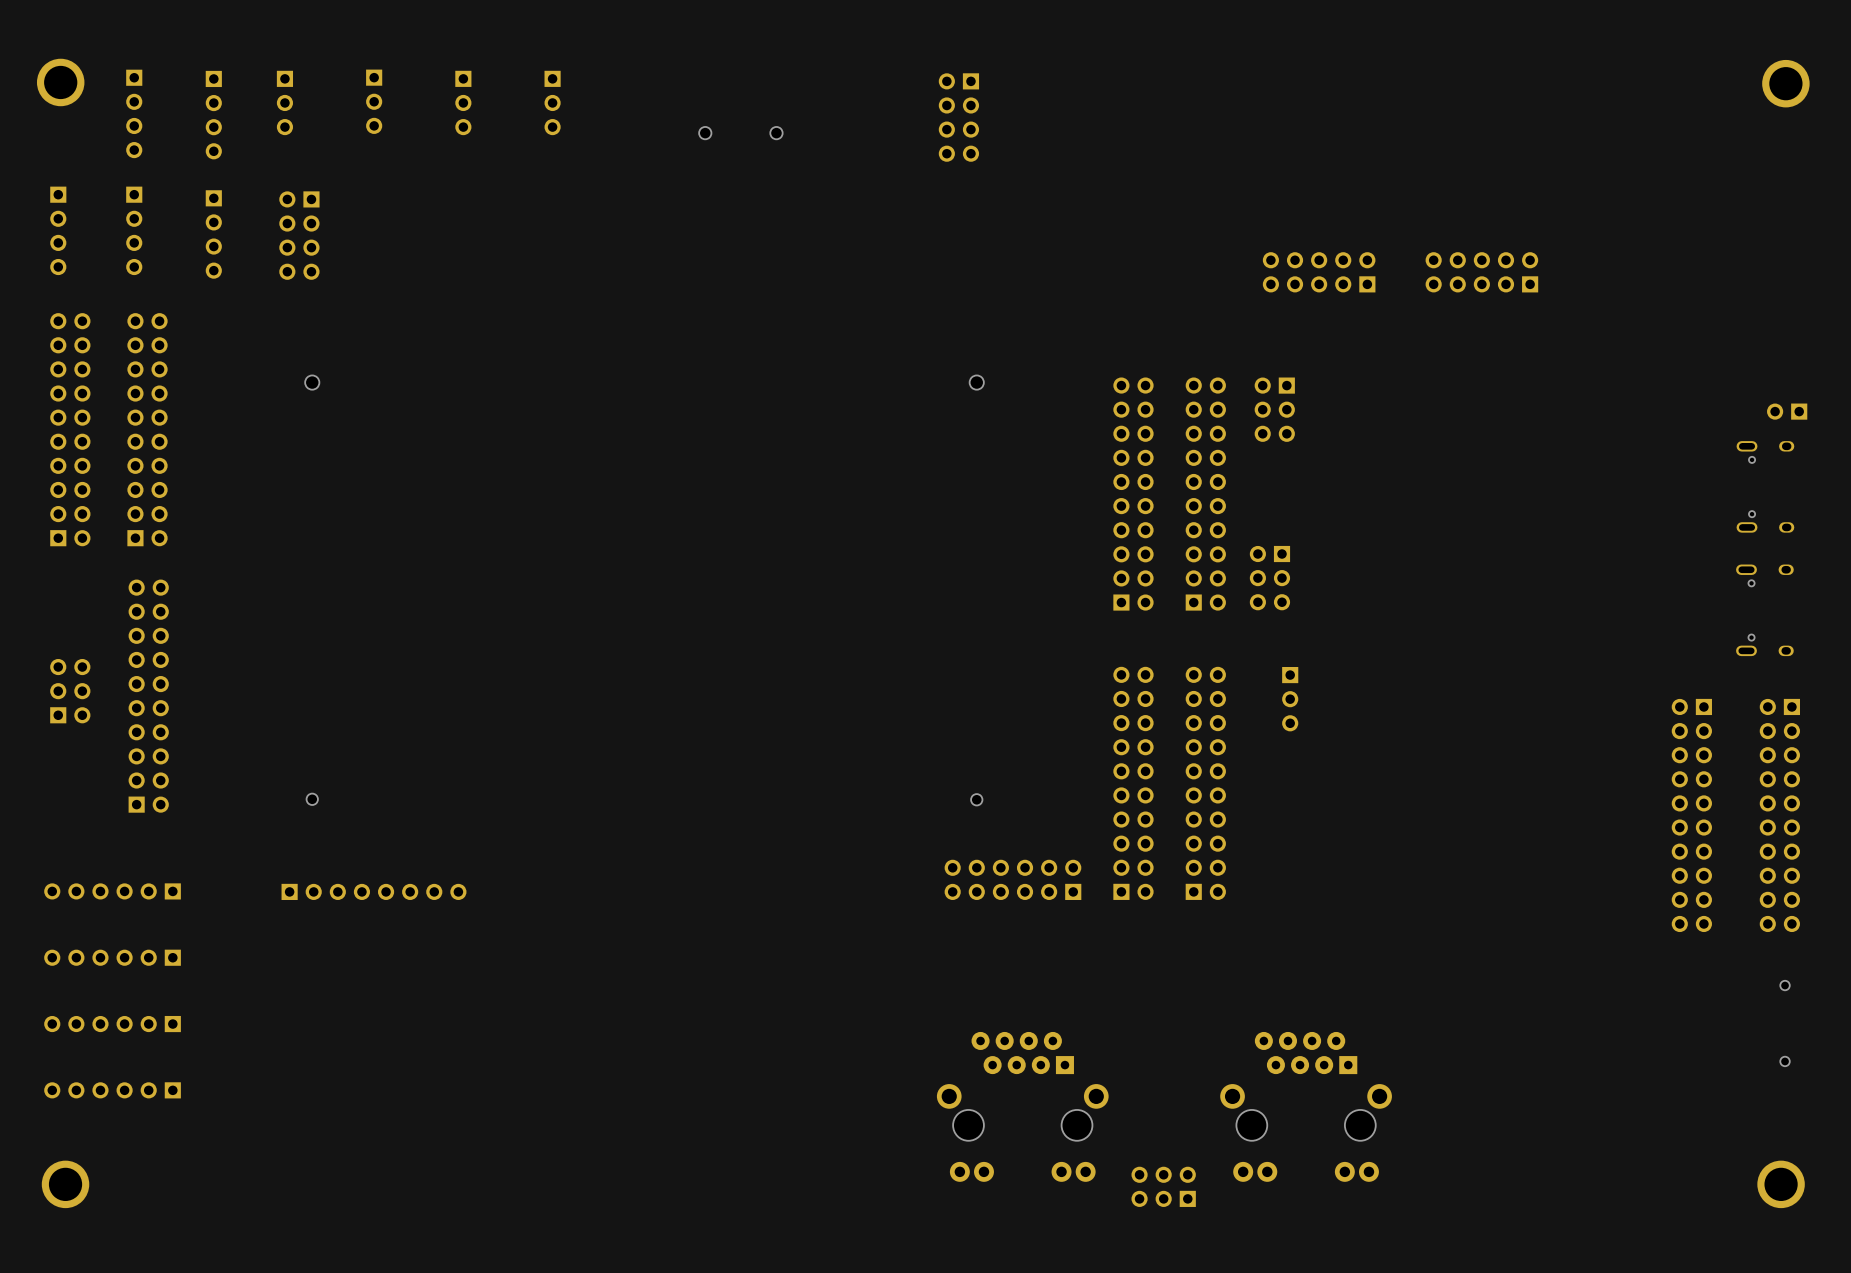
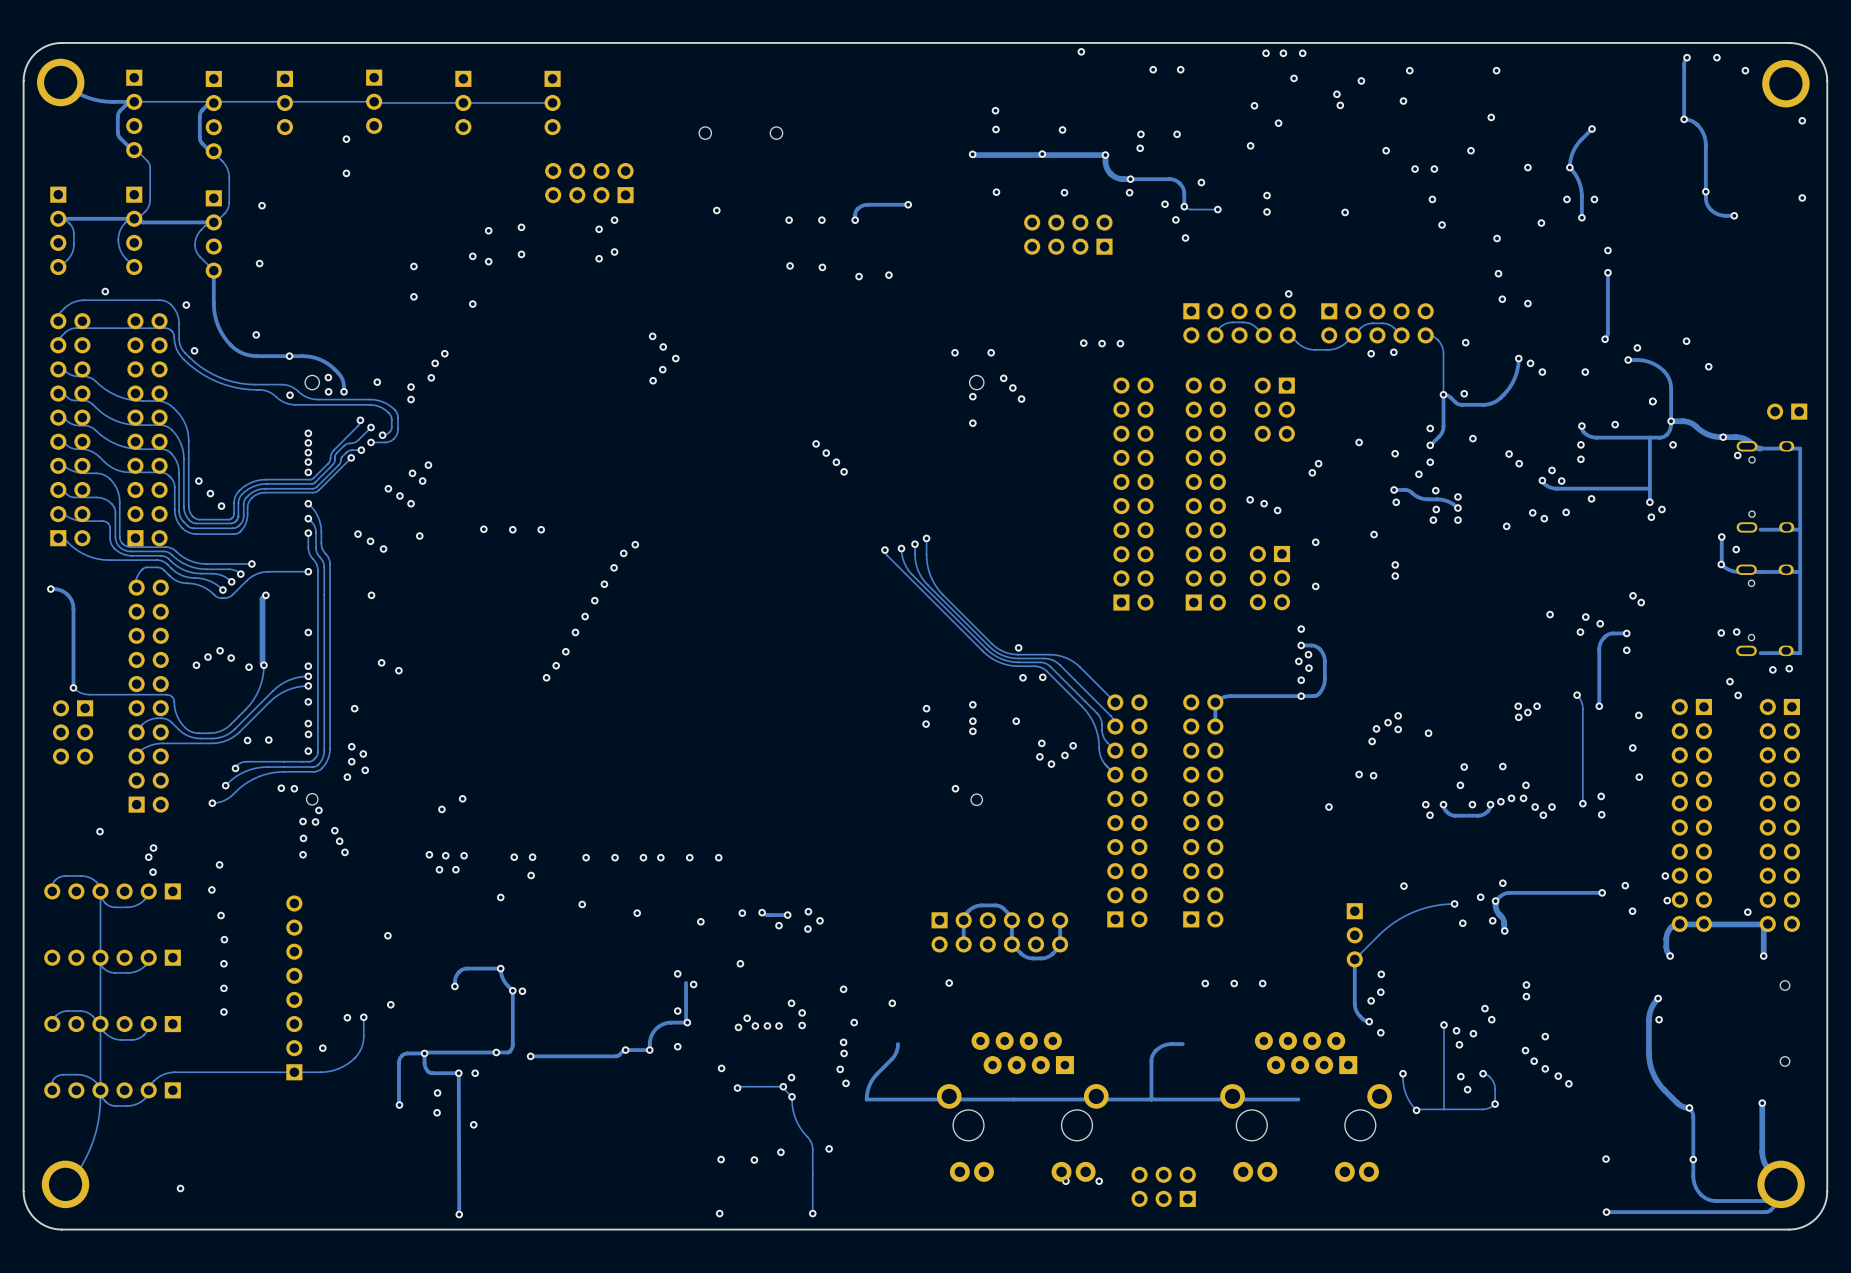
board edge: none -> (1789, 42) (61, 42) (41, 48) (27, 64) (23, 80) (23, 1191) (29, 1211) (41, 1223) (61, 1229) (1789, 1229) (1809, 1223) (1821, 1211) (1827, 1191) (1827, 80) (1825, 68) (1816, 54) (1801, 45) (1789, 42)
via: none -> (1081, 51)
via: none -> (1266, 53)
via: none -> (1283, 53)
via: none -> (1302, 53)
track: none -> (1687, 57) (1684, 64) (1684, 119) (1695, 123) (1704, 136) (1706, 202) (1710, 209) (1717, 214) (1734, 215)
via: none -> (1687, 57)
via: none -> (1716, 57)
via: none -> (1153, 69)
via: none -> (1180, 69)
via: none -> (1409, 70)
via: none -> (1496, 70)
via: none -> (1745, 70)
via: none -> (1294, 78)
track: none -> (61, 80) (74, 91) (90, 98) (106, 101) (134, 101)
via: none -> (1361, 80)
via: none -> (1336, 94)
track: none -> (134, 101) (552, 102)
track: none -> (134, 101) (126, 104) (119, 111) (117, 116) (118, 135) (134, 150)
via: none -> (1403, 101)
track: none -> (213, 103) (207, 105) (200, 112) (200, 139) (224, 163) (229, 177) (228, 207) (224, 213) (213, 222)
via: none -> (1254, 105)
via: none -> (1340, 105)
via: none -> (995, 110)
part rotation: 0° (958, 117) -> 90° clockwise (1068, 234)
part position: (958, 117) -> (1068, 234)
via: none -> (1491, 117)
via: none -> (1684, 119)
via: none -> (1802, 120)
via: none -> (1278, 123)
via: none -> (996, 129)
via: none -> (1062, 129)
track: none -> (1592, 129) (1576, 145) (1570, 163) (1569, 167) (1577, 177) (1581, 188) (1581, 217)
via: none -> (1592, 129)
via: none -> (1140, 134)
via: none -> (1177, 134)
via: none -> (346, 139)
via: none -> (1250, 145)
via: none -> (1140, 148)
track: none -> (134, 150) (147, 161) (150, 167) (149, 204) (140, 216) (134, 218)
via: none -> (1386, 150)
via: none -> (1471, 150)
track: none -> (972, 154) (1105, 155) (1106, 167) (1115, 177) (1123, 179) (1173, 179) (1183, 188) (1185, 207) (1191, 209) (1217, 209)
via: none -> (972, 154)
via: none -> (1042, 154)
via: none -> (1105, 155)
via: none -> (1527, 167)
via: none -> (1569, 167)
via: none -> (1415, 169)
via: none -> (1434, 169)
via: none -> (346, 173)
via: none -> (1130, 179)
via: none -> (1201, 182)
part: none -> (589, 183)
via: none -> (1705, 191)
via: none -> (996, 192)
via: none -> (1064, 192)
via: none -> (1129, 192)
via: none -> (1267, 195)
via: none -> (1802, 197)
via: none -> (1432, 199)
via: none -> (1566, 199)
via: none -> (1594, 199)
track: none -> (908, 204) (863, 205) (856, 210) (855, 220)
via: none -> (908, 204)
via: none -> (1165, 204)
via: none -> (262, 205)
via: none -> (1184, 206)
via: none -> (1217, 209)
via: none -> (716, 210)
via: none -> (1267, 211)
via: none -> (1345, 212)
via: none -> (1734, 215)
via: none -> (1581, 217)
track: none -> (58, 218) (65, 220) (72, 227) (73, 247) (71, 255) (61, 265) (57, 266) (52, 264)
track: none -> (134, 218) (58, 218)
track: none -> (134, 218) (142, 222) (213, 222)
track: none -> (134, 218) (123, 224) (118, 239) (121, 252) (134, 267)
via: none -> (1175, 219)
via: none -> (614, 220)
via: none -> (789, 220)
via: none -> (821, 220)
via: none -> (855, 220)
track: none -> (213, 222) (206, 224) (199, 231) (195, 238) (195, 246) (198, 255) (213, 270) (214, 315) (218, 326) (227, 341) (236, 350) (249, 355) (307, 356) (319, 359) (331, 366) (339, 374) (343, 381) (344, 391)
via: none -> (1541, 223)
via: none -> (1442, 224)
via: none -> (521, 227)
via: none -> (599, 229)
via: none -> (488, 230)
part: (299, 235) -> none
via: none -> (1185, 238)
via: none -> (1497, 238)
via: none -> (1607, 250)
via: none -> (614, 251)
via: none -> (521, 254)
via: none -> (472, 256)
via: none -> (599, 258)
via: none -> (488, 261)
via: none -> (259, 263)
via: none -> (790, 265)
via: none -> (413, 266)
via: none -> (822, 267)
part: (1319, 272) -> none
part: (1481, 272) -> none
track: none -> (1607, 272) (1607, 332) (1605, 339)
via: none -> (1607, 272)
via: none -> (1498, 273)
via: none -> (888, 275)
via: none -> (859, 276)
via: none -> (105, 291)
via: none -> (1288, 293)
via: none -> (413, 296)
via: none -> (1502, 299)
via: none -> (1527, 303)
via: none -> (472, 304)
via: none -> (186, 305)
track: none -> (59, 316) (67, 306) (80, 300) (166, 301) (173, 307) (178, 316) (179, 340) (182, 349) (194, 362) (212, 374) (240, 383) (287, 385) (312, 399) (374, 399) (391, 406) (397, 415) (396, 435) (388, 441) (371, 442)
part: none -> (1239, 323)
part: none -> (1377, 323)
via: none -> (256, 334)
track: none -> (1263, 335) (1252, 324) (1243, 322) (1225, 323) (1217, 330) (1215, 335)
track: none -> (1287, 335) (1303, 346) (1314, 349) (1330, 349) (1340, 346) (1361, 326) (1370, 323) (1388, 324) (1401, 335)
track: none -> (1425, 335) (1435, 337) (1442, 347) (1443, 394)
via: none -> (652, 336)
via: none -> (1605, 339)
track: none -> (59, 340) (66, 331) (74, 328) (167, 328) (173, 333) (175, 346) (181, 356) (196, 370) (210, 378) (233, 387) (266, 390) (281, 401) (291, 404) (376, 405) (385, 410) (391, 417) (390, 430) (382, 435)
via: none -> (1686, 341)
via: none -> (1465, 342)
via: none -> (1083, 343)
via: none -> (1102, 343)
via: none -> (1120, 343)
via: none -> (663, 346)
via: none -> (1637, 347)
via: none -> (194, 350)
via: none -> (955, 352)
via: none -> (991, 352)
via: none -> (1393, 352)
via: none -> (444, 353)
via: none -> (1371, 353)
via: none -> (289, 356)
via: none -> (675, 358)
track: none -> (1518, 358) (1512, 382) (1503, 394) (1492, 402) (1460, 404) (1443, 394)
via: none -> (1518, 358)
track: none -> (1628, 360) (1651, 362) (1661, 368) (1668, 376) (1671, 388) (1671, 425) (1668, 432) (1661, 437) (1594, 437) (1585, 433) (1581, 426)
via: none -> (1628, 360)
via: none -> (435, 363)
via: none -> (1530, 363)
track: none -> (59, 364) (71, 374) (91, 378) (117, 395) (136, 400) (163, 402) (179, 413) (185, 424) (188, 436) (189, 509) (193, 516) (198, 519) (231, 518) (233, 515) (236, 494) (245, 485) (255, 481) (312, 478) (328, 462) (332, 451) (358, 426) (360, 420)
via: none -> (1708, 366)
via: none -> (662, 369)
via: none -> (1542, 372)
via: none -> (1585, 372)
via: none -> (328, 377)
via: none -> (431, 377)
via: none -> (1003, 378)
via: none -> (653, 380)
via: none -> (377, 382)
via: none -> (411, 387)
via: none -> (1012, 387)
track: none -> (59, 388) (69, 399) (88, 401) (105, 415) (120, 422) (132, 424) (161, 425) (169, 427) (179, 439) (183, 451) (184, 509) (188, 518) (195, 523) (230, 523) (235, 521) (238, 516)
via: none -> (328, 391)
via: none -> (344, 391)
via: none -> (1464, 393)
track: none -> (1443, 394) (1442, 430) (1430, 445)
via: none -> (1443, 394)
via: none -> (290, 395)
via: none -> (972, 396)
via: none -> (411, 399)
via: none -> (1021, 399)
via: none -> (1652, 401)
track: none -> (59, 413) (69, 423) (90, 426) (105, 438) (122, 446) (134, 448) (163, 449) (169, 451) (178, 467) (179, 515) (187, 525) (192, 528) (236, 527) (243, 519) (244, 500) (251, 492) (262, 488) (314, 488) (339, 464) (341, 457) (347, 451) (361, 450)
via: none -> (360, 420)
track: none -> (1671, 421) (1690, 422) (1704, 433) (1714, 436) (1742, 438) (1758, 448) (1800, 448) (1800, 653) (1760, 653)
via: none -> (1671, 421)
via: none -> (972, 423)
via: none -> (1615, 424)
via: none -> (1581, 426)
track: none -> (371, 427) (357, 440) (344, 445) (335, 454) (333, 463) (314, 483) (263, 484) (247, 489) (238, 499) (238, 517)
via: none -> (371, 427)
via: none -> (1430, 428)
via: none -> (308, 433)
via: none -> (382, 435)
track: none -> (59, 437) (71, 447) (94, 452) (116, 469) (129, 472) (161, 472) (168, 475) (174, 485) (176, 519) (183, 529) (194, 533) (238, 533) (246, 521) (248, 502) (255, 495) (265, 492) (316, 491) (351, 457)
track: none -> (1649, 437) (1649, 502)
via: none -> (1723, 437)
via: none -> (1472, 438)
via: none -> (308, 442)
via: none -> (371, 442)
via: none -> (1359, 442)
via: none -> (816, 443)
via: none -> (1580, 444)
via: none -> (1673, 444)
via: none -> (1430, 445)
via: none -> (361, 450)
via: none -> (308, 452)
via: none -> (826, 453)
via: none -> (1395, 453)
via: none -> (1509, 454)
via: none -> (1737, 455)
via: none -> (351, 457)
via: none -> (1580, 459)
track: none -> (59, 461) (72, 470) (101, 474) (112, 481) (119, 495) (119, 537) (125, 545) (168, 547) (186, 558) (202, 563) (251, 563)
via: none -> (308, 462)
via: none -> (836, 462)
via: none -> (1430, 462)
via: none -> (1318, 463)
via: none -> (1519, 463)
via: none -> (428, 465)
via: none -> (1552, 470)
via: none -> (844, 471)
via: none -> (308, 472)
via: none -> (1312, 472)
via: none -> (412, 473)
via: none -> (1418, 474)
track: none -> (1542, 480) (1546, 485) (1555, 488) (1649, 488)
via: none -> (1542, 480)
via: none -> (198, 481)
via: none -> (422, 481)
via: none -> (1561, 481)
track: none -> (59, 485) (70, 496) (99, 497) (111, 503) (115, 511) (115, 540) (123, 549) (129, 551) (166, 551) (192, 567) (230, 569) (240, 574)
via: none -> (388, 488)
track: none -> (1394, 489) (1407, 490) (1422, 498) (1445, 500) (1457, 508)
via: none -> (1394, 489)
via: none -> (1435, 490)
via: none -> (210, 493)
via: none -> (399, 495)
via: none -> (1457, 496)
via: none -> (1591, 498)
via: none -> (1250, 499)
via: none -> (1396, 502)
via: none -> (1649, 502)
track: none -> (308, 503) (318, 517) (321, 547) (329, 562) (328, 756) (323, 766) (318, 770) (278, 772) (262, 775) (248, 781) (226, 799) (212, 803)
via: none -> (308, 503)
via: none -> (411, 503)
via: none -> (1264, 503)
via: none -> (221, 506)
via: none -> (1457, 508)
track: none -> (59, 509) (74, 519) (106, 522) (109, 526) (111, 545) (122, 553) (163, 556) (184, 570) (197, 573) (217, 574) (231, 581)
via: none -> (1436, 509)
via: none -> (1661, 509)
via: none -> (1277, 510)
via: none -> (1532, 512)
via: none -> (1566, 512)
via: none -> (1651, 517)
track: none -> (308, 518) (315, 528) (316, 551) (324, 566) (323, 756) (319, 763) (314, 766) (267, 767) (251, 769) (236, 776) (225, 785)
via: none -> (308, 518)
via: none -> (1544, 518)
via: none -> (1433, 520)
via: none -> (1457, 520)
via: none -> (1506, 526)
via: none -> (483, 529)
via: none -> (512, 529)
via: none -> (541, 529)
track: none -> (1800, 529) (1760, 529)
track: none -> (59, 533) (77, 550) (92, 557) (109, 560) (159, 560) (182, 575) (206, 579) (222, 590)
track: none -> (308, 533) (308, 551) (316, 563) (317, 570) (317, 754) (309, 761) (244, 761) (238, 764) (235, 768)
via: none -> (308, 533)
via: none -> (358, 534)
via: none -> (1374, 534)
via: none -> (419, 536)
track: none -> (1721, 536) (1721, 564) (1729, 570) (1739, 571) (1800, 571)
via: none -> (1721, 536)
track: none -> (926, 538) (927, 565) (936, 586) (994, 646) (1010, 653) (1053, 654) (1066, 657) (1077, 664) (1115, 702)
via: none -> (926, 538)
via: none -> (370, 541)
via: none -> (1315, 542)
via: none -> (635, 544)
track: none -> (914, 544) (915, 562) (922, 578) (989, 646) (998, 653) (1010, 657) (1047, 658) (1055, 661) (1110, 716) (1115, 726)
via: none -> (914, 544)
track: none -> (901, 548) (904, 562) (909, 572) (989, 651) (1009, 661) (1041, 662) (1050, 666) (1098, 715) (1101, 720) (1103, 736) (1115, 750)
via: none -> (901, 548)
via: none -> (383, 549)
via: none -> (1736, 549)
track: none -> (884, 550) (887, 555) (986, 654) (1004, 664) (1037, 666) (1047, 671) (1089, 715) (1096, 730) (1101, 757) (1106, 766)
via: none -> (884, 550)
via: none -> (623, 553)
via: none -> (251, 563)
via: none -> (1395, 564)
via: none -> (1721, 564)
via: none -> (614, 567)
track: none -> (308, 571) (259, 573) (251, 576) (231, 595) (225, 598) (216, 596) (201, 586) (177, 581) (158, 567) (142, 568) (136, 577) (135, 586)
via: none -> (308, 571)
via: none -> (240, 574)
via: none -> (1395, 576)
via: none -> (231, 581)
via: none -> (604, 584)
via: none -> (1315, 586)
track: none -> (50, 589) (65, 593) (73, 604) (73, 687) (86, 694) (169, 695) (173, 699) (175, 711) (181, 723) (189, 730) (198, 733) (215, 732) (226, 728) (245, 709) (256, 694) (263, 671) (262, 598) (265, 595)
via: none -> (50, 589)
via: none -> (222, 590)
via: none -> (265, 595)
via: none -> (371, 595)
via: none -> (1633, 595)
via: none -> (594, 600)
via: none -> (1641, 602)
via: none -> (1550, 614)
via: none -> (585, 616)
via: none -> (1585, 617)
via: none -> (1600, 623)
via: none -> (1301, 629)
via: none -> (1736, 631)
via: none -> (308, 632)
via: none -> (575, 632)
via: none -> (1580, 632)
via: none -> (1721, 632)
track: none -> (1626, 633) (1608, 634) (1600, 643) (1599, 706)
via: none -> (1626, 633)
track: none -> (1301, 645) (1315, 646) (1324, 656) (1324, 681) (1318, 694) (1313, 696) (1224, 696) (1215, 702) (1215, 726)
via: none -> (1301, 645)
via: none -> (1018, 647)
via: none -> (220, 650)
via: none -> (1626, 650)
via: none -> (565, 651)
via: none -> (1308, 654)
via: none -> (208, 657)
via: none -> (231, 658)
via: none -> (1298, 661)
via: none -> (381, 662)
via: none -> (196, 665)
via: none -> (263, 665)
via: none -> (556, 665)
via: none -> (308, 666)
via: none -> (249, 667)
via: none -> (1308, 668)
via: none -> (1789, 668)
via: none -> (1772, 669)
via: none -> (398, 670)
track: none -> (308, 676) (293, 678) (280, 684) (232, 731) (221, 737) (191, 737) (163, 718) (149, 719) (135, 730)
via: none -> (308, 676)
via: none -> (546, 677)
via: none -> (1023, 677)
via: none -> (1042, 677)
via: none -> (1301, 680)
via: none -> (1729, 681)
track: none -> (308, 685) (292, 688) (277, 695) (236, 734) (227, 740) (215, 743) (155, 744) (144, 748) (135, 754)
via: none -> (308, 685)
via: none -> (73, 687)
part rotation: 0° (70, 691) -> 180° (73, 732)
part position: (70, 691) -> (73, 732)
track: none -> (1577, 695) (1581, 701) (1582, 709) (1582, 803)
via: none -> (1577, 695)
via: none -> (1738, 695)
via: none -> (1301, 696)
part: (1290, 699) -> none
via: none -> (308, 701)
via: none -> (972, 704)
via: none -> (1518, 706)
via: none -> (1537, 706)
via: none -> (1599, 706)
via: none -> (354, 708)
via: none -> (926, 708)
via: none -> (1527, 712)
via: none -> (1398, 715)
via: none -> (1638, 715)
via: none -> (1518, 717)
via: none -> (972, 721)
via: none -> (1016, 721)
via: none -> (1388, 722)
via: none -> (308, 723)
via: none -> (926, 724)
via: none -> (1376, 728)
via: none -> (1398, 729)
via: none -> (972, 731)
via: none -> (1428, 733)
via: none -> (308, 734)
via: none -> (247, 740)
via: none -> (268, 740)
via: none -> (1372, 741)
via: none -> (1041, 743)
via: none -> (1073, 745)
via: none -> (351, 746)
via: none -> (1632, 747)
via: none -> (308, 751)
via: none -> (363, 753)
via: none -> (1064, 755)
via: none -> (1039, 756)
via: none -> (351, 761)
via: none -> (1051, 764)
via: none -> (1502, 766)
via: none -> (1464, 767)
via: none -> (235, 768)
via: none -> (365, 770)
via: none -> (1359, 774)
via: none -> (1373, 775)
via: none -> (347, 777)
via: none -> (1639, 777)
part position: (1133, 783) -> (1127, 810)
part position: (1205, 783) -> (1203, 810)
via: none -> (225, 785)
via: none -> (1460, 785)
via: none -> (1525, 785)
via: none -> (281, 788)
via: none -> (294, 788)
via: none -> (955, 788)
via: none -> (1601, 796)
via: none -> (462, 798)
via: none -> (1511, 798)
via: none -> (1523, 798)
via: none -> (1500, 801)
via: none -> (212, 803)
via: none -> (1582, 803)
via: none -> (1425, 804)
track: none -> (1443, 804) (1447, 812) (1455, 815) (1481, 815) (1488, 810) (1490, 804)
via: none -> (1443, 804)
via: none -> (1472, 804)
via: none -> (1490, 804)
via: none -> (1328, 807)
via: none -> (1535, 807)
via: none -> (1552, 807)
via: none -> (441, 809)
via: none -> (318, 810)
via: none -> (1601, 814)
via: none -> (1430, 815)
via: none -> (1543, 815)
via: none -> (303, 821)
via: none -> (315, 821)
via: none -> (334, 830)
via: none -> (100, 831)
via: none -> (303, 838)
via: none -> (339, 841)
via: none -> (153, 848)
via: none -> (344, 852)
via: none -> (303, 854)
via: none -> (429, 854)
via: none -> (445, 855)
via: none -> (464, 855)
via: none -> (148, 857)
via: none -> (514, 857)
via: none -> (532, 857)
via: none -> (586, 857)
via: none -> (615, 857)
via: none -> (643, 857)
via: none -> (660, 857)
via: none -> (689, 857)
via: none -> (718, 857)
via: none -> (219, 864)
via: none -> (439, 869)
via: none -> (455, 869)
via: none -> (153, 872)
via: none -> (531, 875)
via: none -> (1665, 875)
part rotation: 0° (1012, 879) -> 180° (999, 932)
via: none -> (1502, 883)
via: none -> (1625, 885)
via: none -> (1403, 886)
via: none -> (211, 889)
track: none -> (100, 891) (99, 1115) (95, 1132) (86, 1156) (78, 1171) (61, 1191)
track: none -> (100, 891) (98, 885) (94, 880) (81, 875) (58, 877) (53, 883) (52, 891)
track: none -> (148, 891) (146, 897) (140, 903) (126, 907) (108, 905) (102, 899) (100, 891)
part rotation: 0° (374, 891) -> 90° counterclockwise (294, 987)
part position: (374, 891) -> (294, 987)
track: none -> (1602, 892) (1504, 893) (1495, 901) (1495, 905) (1497, 911) (1503, 919) (1504, 930)
via: none -> (1602, 892)
via: none -> (500, 897)
via: none -> (1480, 897)
via: none -> (1667, 900)
via: none -> (1495, 901)
track: none -> (1454, 903) (1426, 907) (1401, 918) (1383, 930) (1354, 959) (1355, 1007) (1360, 1016) (1369, 1021)
via: none -> (1454, 903)
via: none -> (582, 904)
via: none -> (808, 911)
via: none -> (1632, 911)
track: none -> (762, 912) (767, 915) (787, 915)
via: none -> (762, 912)
via: none -> (1747, 912)
via: none -> (637, 913)
via: none -> (742, 913)
via: none -> (221, 915)
via: none -> (787, 915)
via: none -> (819, 920)
track: none -> (1060, 920) (1059, 947) (1047, 957) (1030, 958) (1022, 954) (1011, 944) (1011, 918) (1003, 908) (997, 905) (978, 905) (970, 909) (964, 916) (963, 944)
via: none -> (1492, 920)
via: none -> (700, 921)
via: none -> (1462, 923)
track: none -> (1765, 924) (1675, 924) (1670, 928) (1666, 936) (1666, 948) (1670, 956)
track: none -> (1765, 924) (1763, 956)
via: none -> (778, 925)
via: none -> (807, 929)
via: none -> (1504, 930)
via: none -> (387, 935)
part: none -> (1354, 935)
via: none -> (224, 939)
via: none -> (1670, 956)
via: none -> (1763, 956)
track: none -> (148, 957) (143, 967) (130, 972) (108, 971) (102, 967) (100, 961)
via: none -> (223, 963)
via: none -> (740, 963)
via: none -> (500, 968)
via: none -> (677, 973)
via: none -> (1381, 974)
track: none -> (686, 982) (687, 1022)
via: none -> (949, 983)
via: none -> (1205, 983)
via: none -> (1234, 983)
via: none -> (1262, 983)
via: none -> (693, 984)
via: none -> (1526, 984)
track: none -> (454, 986) (455, 976) (462, 969) (500, 968) (503, 980) (512, 990) (512, 1048) (507, 1052) (424, 1053)
via: none -> (454, 986)
via: none -> (223, 988)
via: none -> (843, 989)
via: none -> (512, 990)
via: none -> (522, 991)
via: none -> (1380, 992)
via: none -> (1526, 996)
track: none -> (1658, 998) (1651, 1008) (1649, 1016) (1649, 1063) (1655, 1077) (1660, 1086) (1678, 1104) (1689, 1107) (1692, 1112) (1693, 1179) (1698, 1192) (1705, 1198) (1713, 1200) (1766, 1201) (1778, 1198) (1789, 1191)
via: none -> (1658, 998)
via: none -> (1371, 1000)
via: none -> (791, 1003)
via: none -> (892, 1003)
via: none -> (390, 1004)
via: none -> (1484, 1008)
via: none -> (223, 1011)
via: none -> (677, 1011)
via: none -> (802, 1012)
via: none -> (347, 1017)
track: none -> (363, 1017) (363, 1040) (359, 1051) (347, 1064) (334, 1070) (320, 1072) (171, 1072) (163, 1074) (154, 1080) (149, 1086) (146, 1097) (136, 1104) (115, 1106) (106, 1102)
via: none -> (363, 1017)
via: none -> (747, 1018)
via: none -> (1491, 1019)
via: none -> (1659, 1019)
via: none -> (1369, 1021)
track: none -> (687, 1022) (668, 1022) (658, 1027) (651, 1035) (649, 1050) (624, 1050) (616, 1056) (530, 1056)
via: none -> (687, 1022)
via: none -> (854, 1022)
track: none -> (52, 1024) (54, 1017) (61, 1012) (83, 1011) (92, 1016) (107, 1035) (121, 1039) (140, 1037) (146, 1032) (148, 1024)
via: none -> (755, 1025)
via: none -> (767, 1025)
via: none -> (778, 1025)
via: none -> (802, 1025)
track: none -> (1443, 1025) (1443, 1109)
via: none -> (1443, 1025)
via: none -> (738, 1027)
via: none -> (1456, 1030)
via: none -> (1380, 1032)
via: none -> (1473, 1033)
via: none -> (1545, 1036)
via: none -> (843, 1042)
track: none -> (898, 1044) (893, 1057) (871, 1081) (866, 1099) (1298, 1099)
track: none -> (1182, 1044) (1165, 1045) (1153, 1054) (1151, 1099)
via: none -> (1459, 1044)
via: none -> (677, 1046)
via: none -> (322, 1048)
via: none -> (625, 1050)
via: none -> (649, 1050)
via: none -> (1525, 1050)
via: none -> (496, 1052)
track: none -> (424, 1053) (406, 1053) (400, 1058) (399, 1105)
track: none -> (424, 1053) (425, 1066) (429, 1072) (458, 1073) (458, 1214)
via: none -> (424, 1053)
via: none -> (844, 1053)
via: none -> (530, 1056)
via: none -> (1534, 1061)
via: none -> (721, 1068)
via: none -> (1545, 1068)
via: none -> (840, 1069)
via: none -> (458, 1073)
via: none -> (475, 1073)
via: none -> (1403, 1073)
track: none -> (1483, 1073) (1490, 1077) (1494, 1086) (1495, 1104) (1490, 1107) (1482, 1109) (1416, 1110) (1406, 1095) (1403, 1073)
via: none -> (1483, 1073)
via: none -> (1460, 1076)
via: none -> (1558, 1076)
via: none -> (791, 1077)
via: none -> (846, 1083)
via: none -> (1568, 1083)
via: none -> (783, 1086)
track: none -> (737, 1088) (783, 1086) (792, 1096) (796, 1119) (812, 1146) (812, 1213)
via: none -> (737, 1088)
via: none -> (1467, 1089)
track: none -> (52, 1090) (52, 1080) (57, 1076) (82, 1075) (89, 1077) (98, 1084) (101, 1095) (106, 1102)
via: none -> (437, 1093)
via: none -> (792, 1096)
track: none -> (1762, 1103) (1763, 1159) (1768, 1169) (1789, 1191)
via: none -> (1762, 1103)
via: none -> (1495, 1104)
via: none -> (399, 1105)
via: none -> (1689, 1107)
via: none -> (1416, 1110)
via: none -> (437, 1112)
via: none -> (473, 1124)
via: none -> (829, 1148)
via: none -> (780, 1152)
via: none -> (721, 1159)
via: none -> (1606, 1159)
via: none -> (1693, 1159)
via: none -> (754, 1160)
via: none -> (1065, 1181)
via: none -> (1099, 1181)
via: none -> (180, 1188)
track: none -> (1789, 1191) (1766, 1212) (1606, 1210)
via: none -> (1606, 1212)
via: none -> (719, 1213)
via: none -> (812, 1213)
via: none -> (459, 1214)

